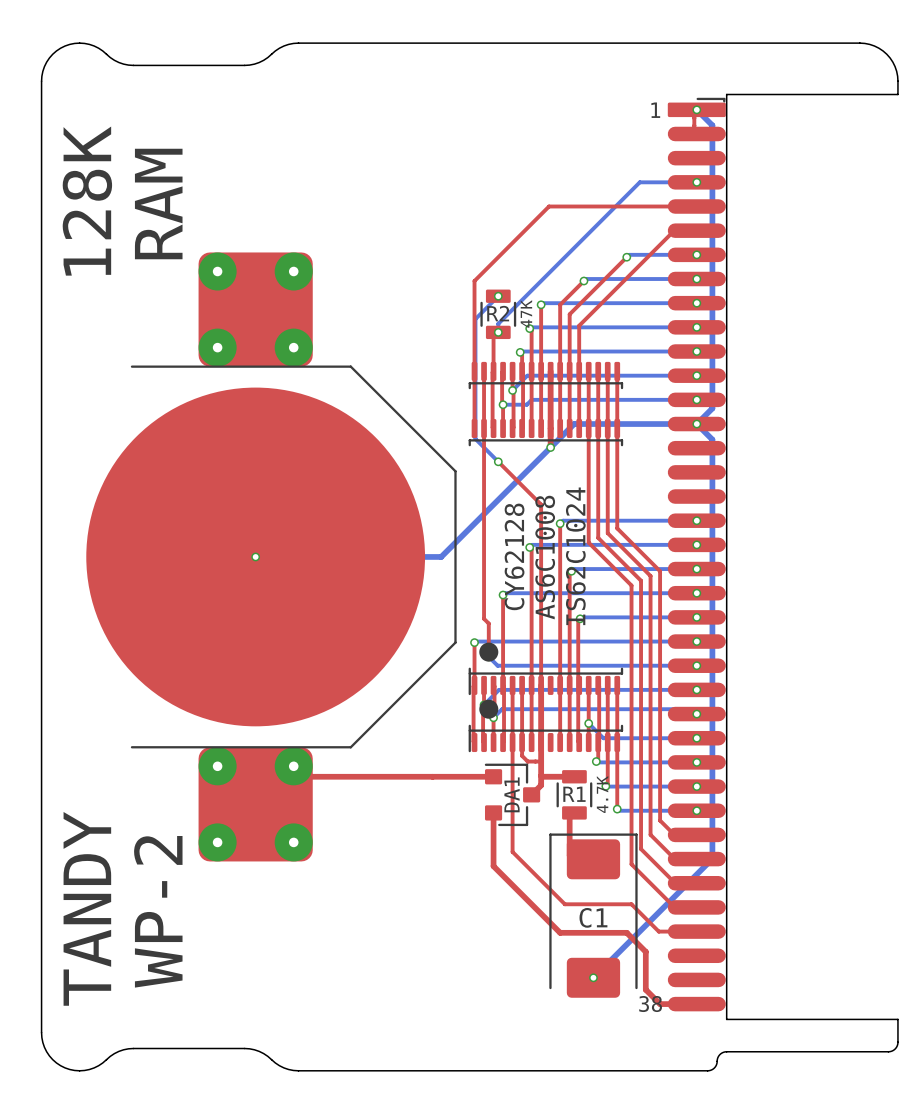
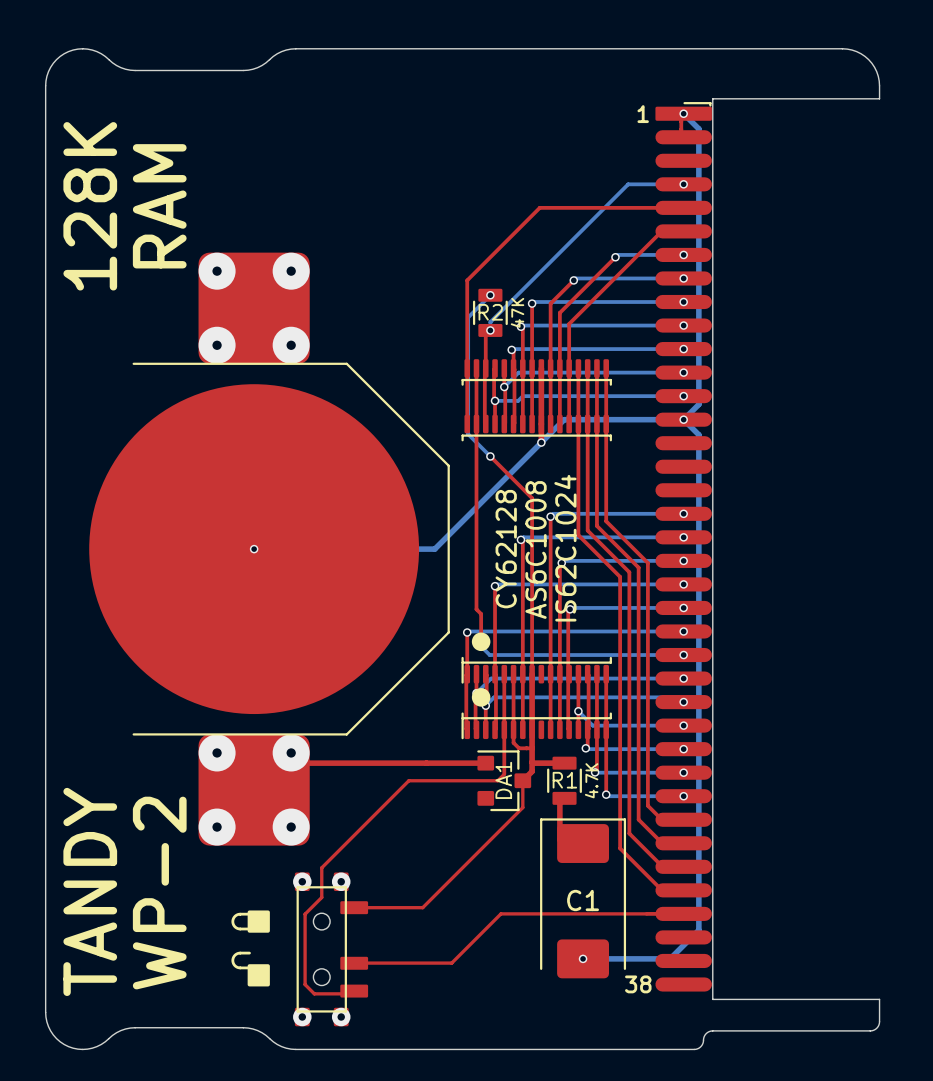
top track: (512, 788) (512, 851) (564, 904) (631, 904) (658, 931) -> (354, 963) (451, 963) (500, 913) (646, 913)
top track: none -> (504, 774) (497, 780) (408, 780) (321, 867) (321, 897) (305, 914) (305, 984) (314, 993) (351, 993) (354, 991)
top track: none -> (522, 780) (522, 807) (422, 907) (354, 907)
top track: (493, 812) (493, 866) (560, 932) (626, 932) (645, 951) (645, 989) (660, 1004) (696, 1004) -> none
bottom track: (712, 858) (593, 977) -> (698, 843) (698, 930) (670, 958) (583, 958)
via: none -> (302, 881)
via: none -> (341, 881)
drawing: none -> [231, 910, 270, 987]
part: none -> (331, 949)
via: none -> (302, 1017)
via: none -> (341, 1017)

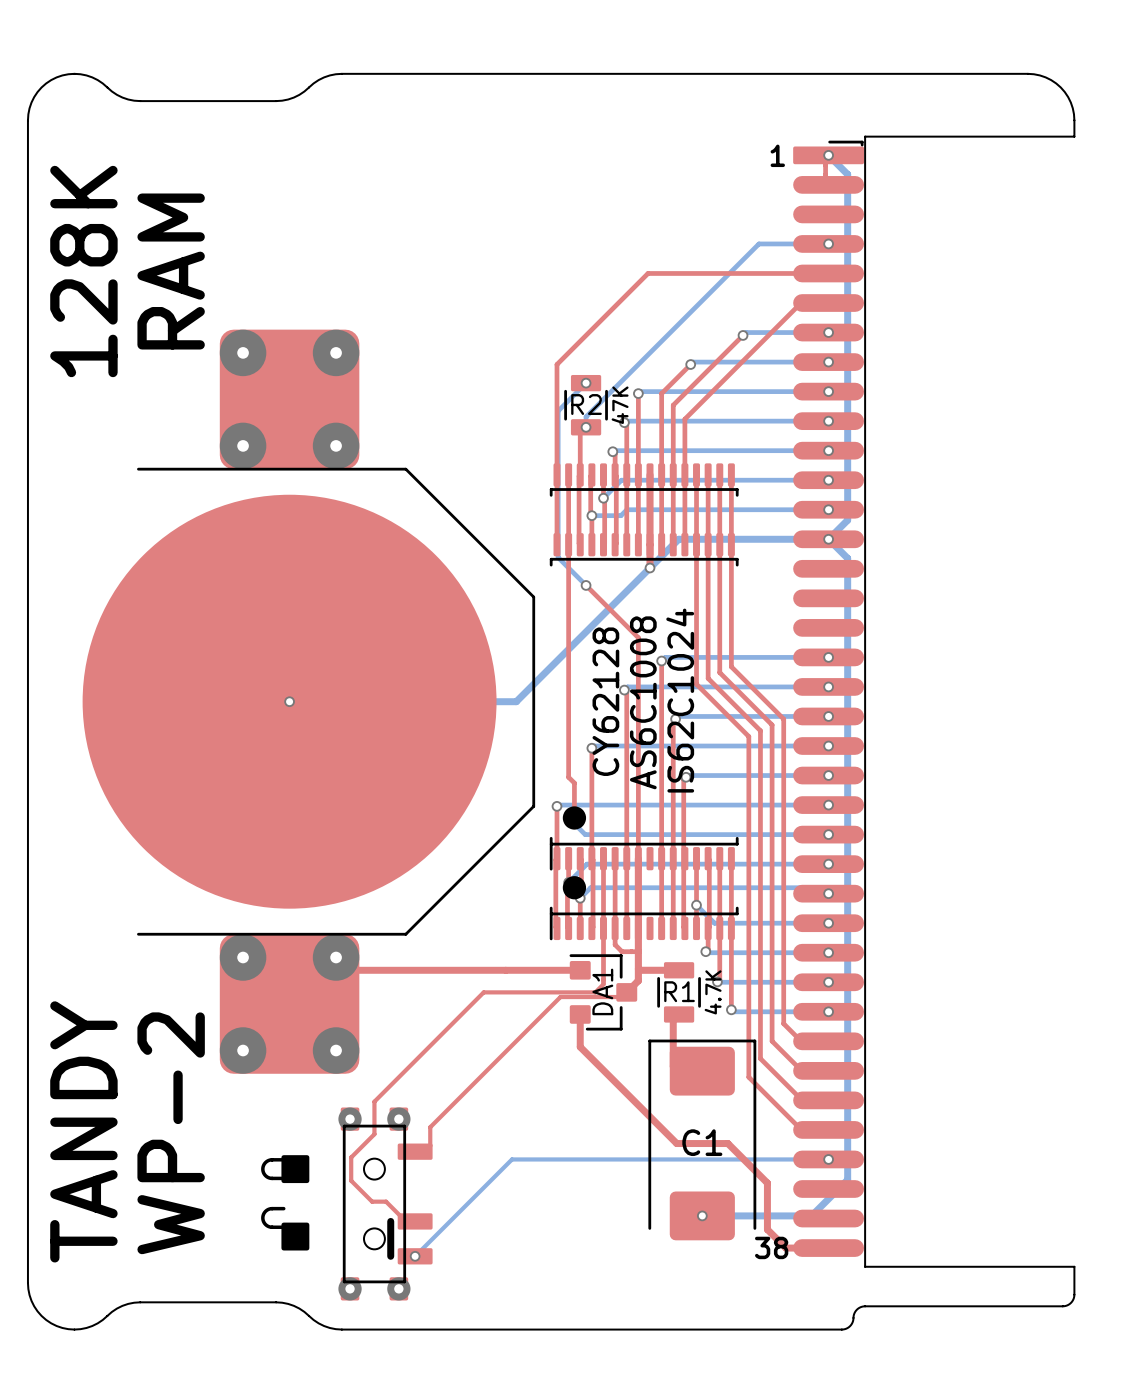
top track: (522, 780) (522, 807) (422, 907) (361, 907) -> (626, 992) (622, 997) (560, 997) (430, 1127) (430, 1145) (424, 1151)
top track: none -> (580, 1014) (580, 1047) (676, 1143) (727, 1143) (767, 1183) (767, 1229) (785, 1248) (828, 1248)
top track: (321, 893) (321, 897) (305, 914) (305, 984) (314, 993) (351, 993) (354, 991) -> (374, 1134) (351, 1157) (351, 1180) (372, 1201) (386, 1201) (405, 1221) (415, 1221)
top track: (683, 913) (500, 913) (451, 963) (354, 963) -> none
bottom track: none -> (828, 1159) (512, 1159) (415, 1256)
via: none -> (828, 1159)
line: none -> (390, 1221) (390, 1256)
via: none -> (415, 1256)

